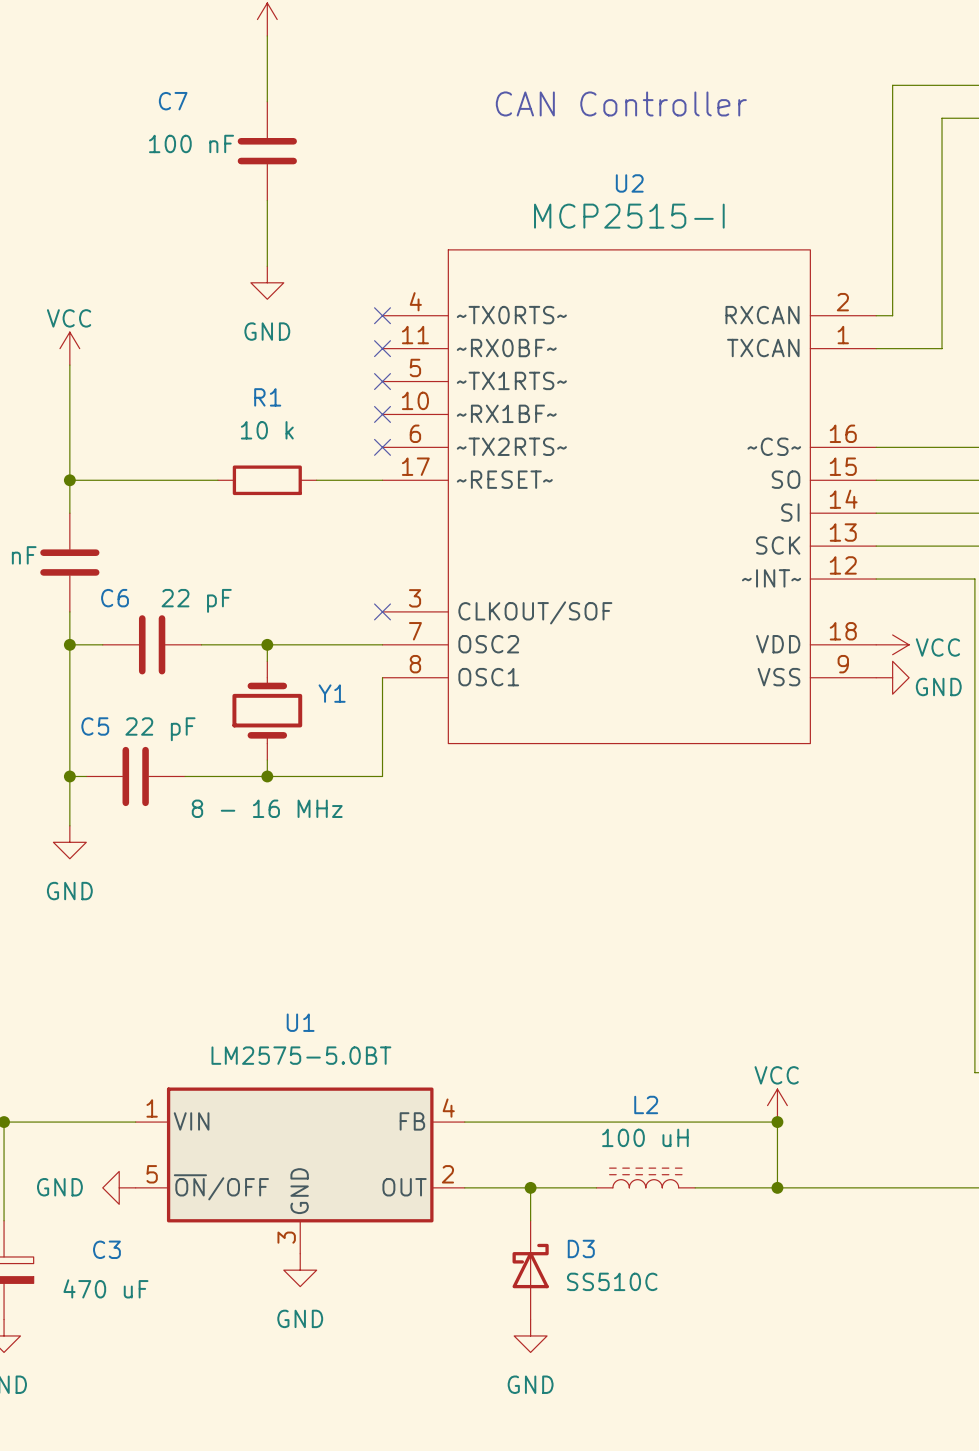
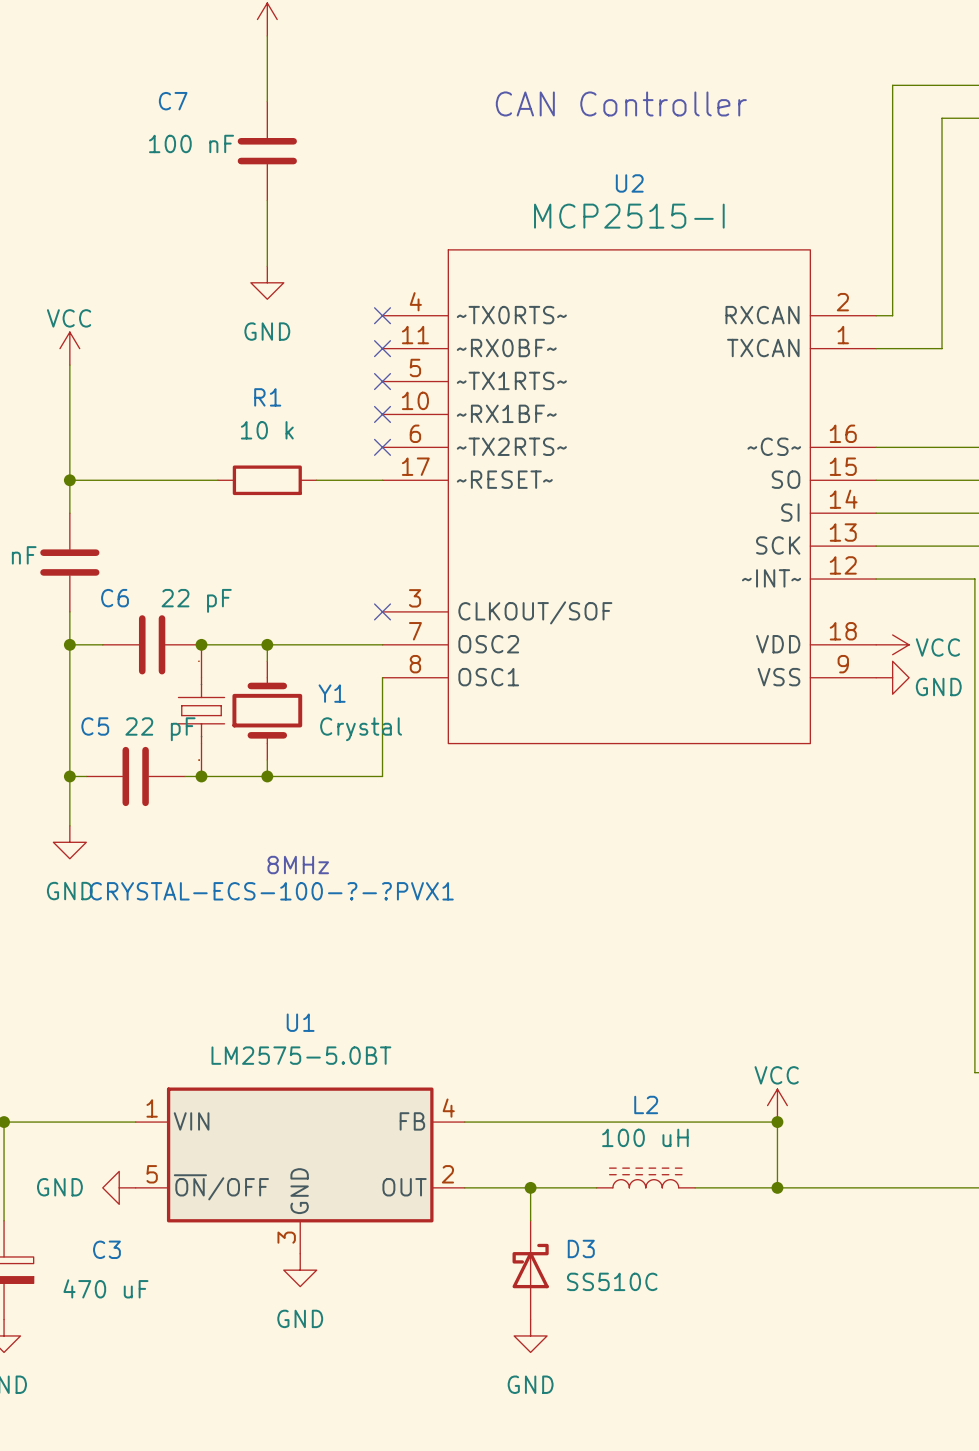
junction: none -> (201, 644)
CRYSTAL-ECS-100-?-?PVX1: none -> (201, 710)
junction: none -> (201, 776)
Y1 value: 8 - 16 MHz (267, 808) -> Crystal (361, 729)
text: none -> 8MHz (298, 865)

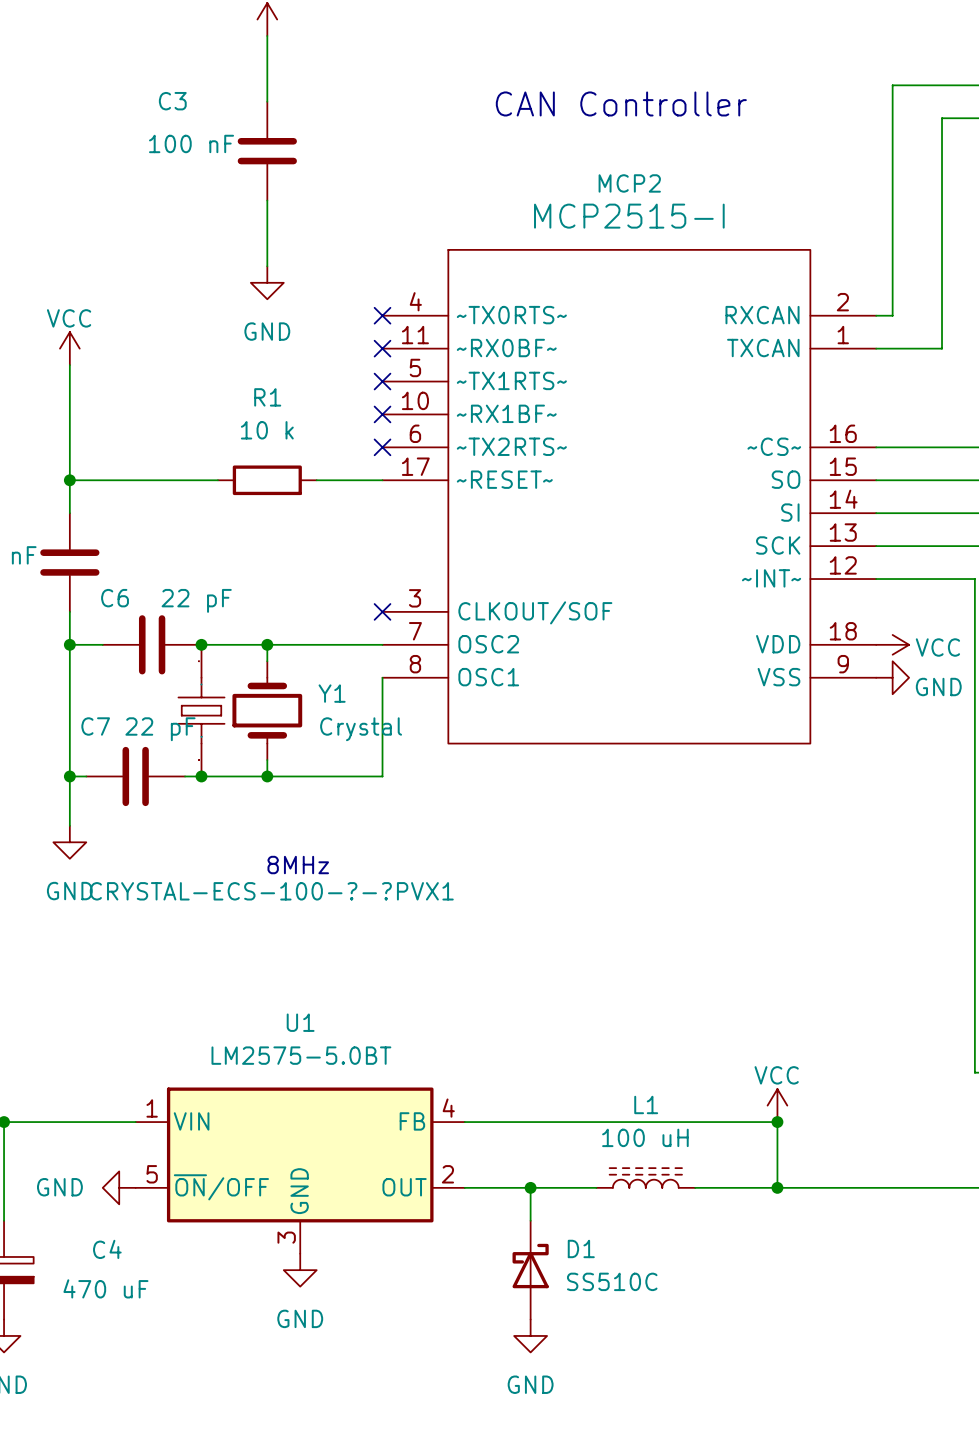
C7 name: C7 (173, 101) -> C3 (172, 101)
U2 name: U2 (629, 183) -> MCP2 (629, 183)
C5 name: C5 (95, 726) -> C7 (95, 726)
L2 name: L2 (646, 1104) -> L1 (646, 1104)
D3 name: D3 (581, 1248) -> D1 (581, 1248)
C3 name: C3 (106, 1249) -> C4 (107, 1249)

